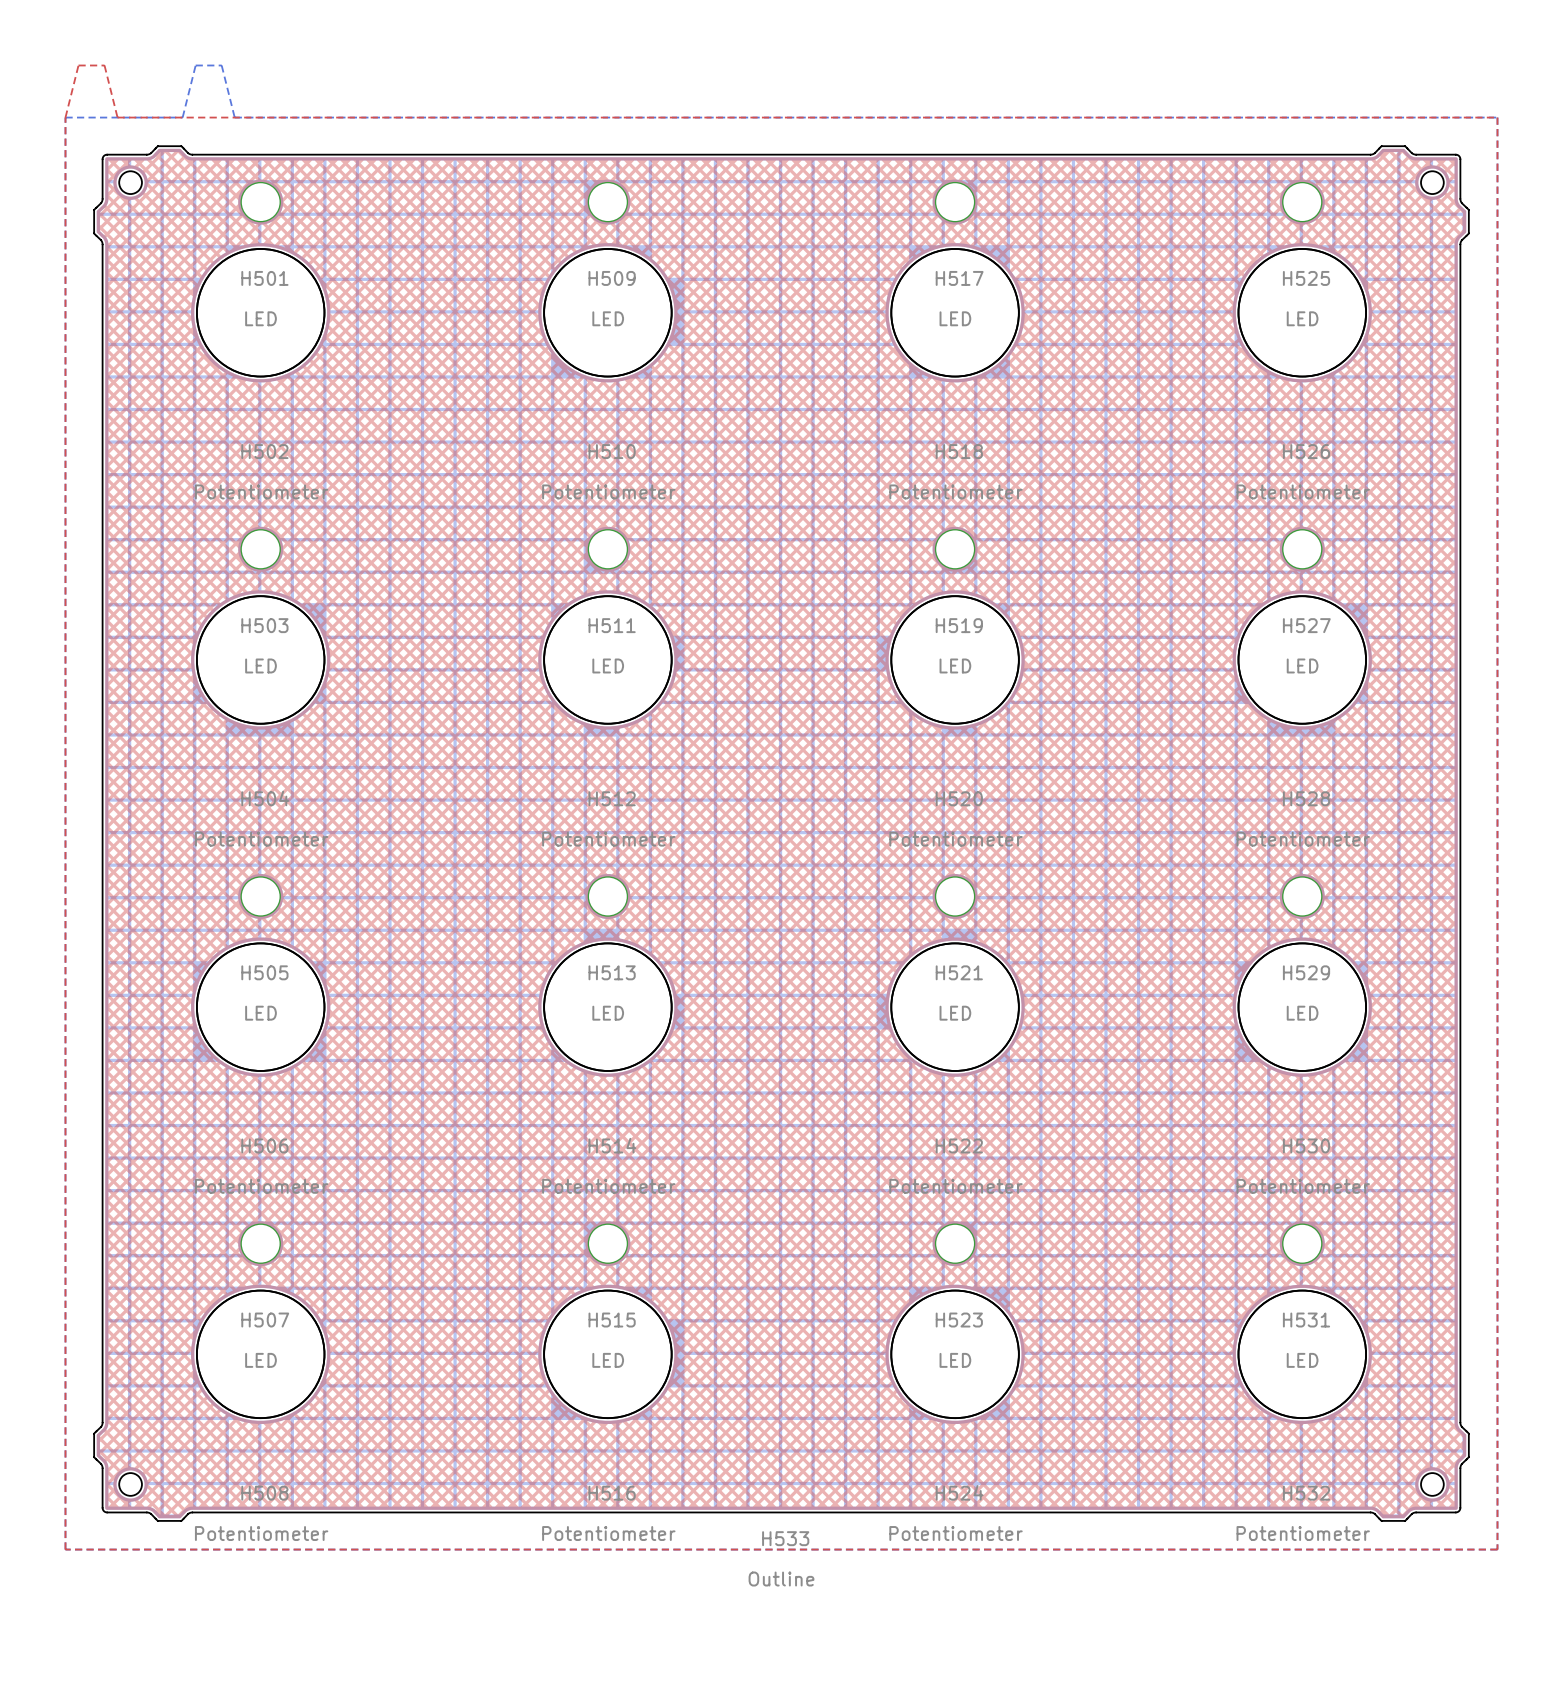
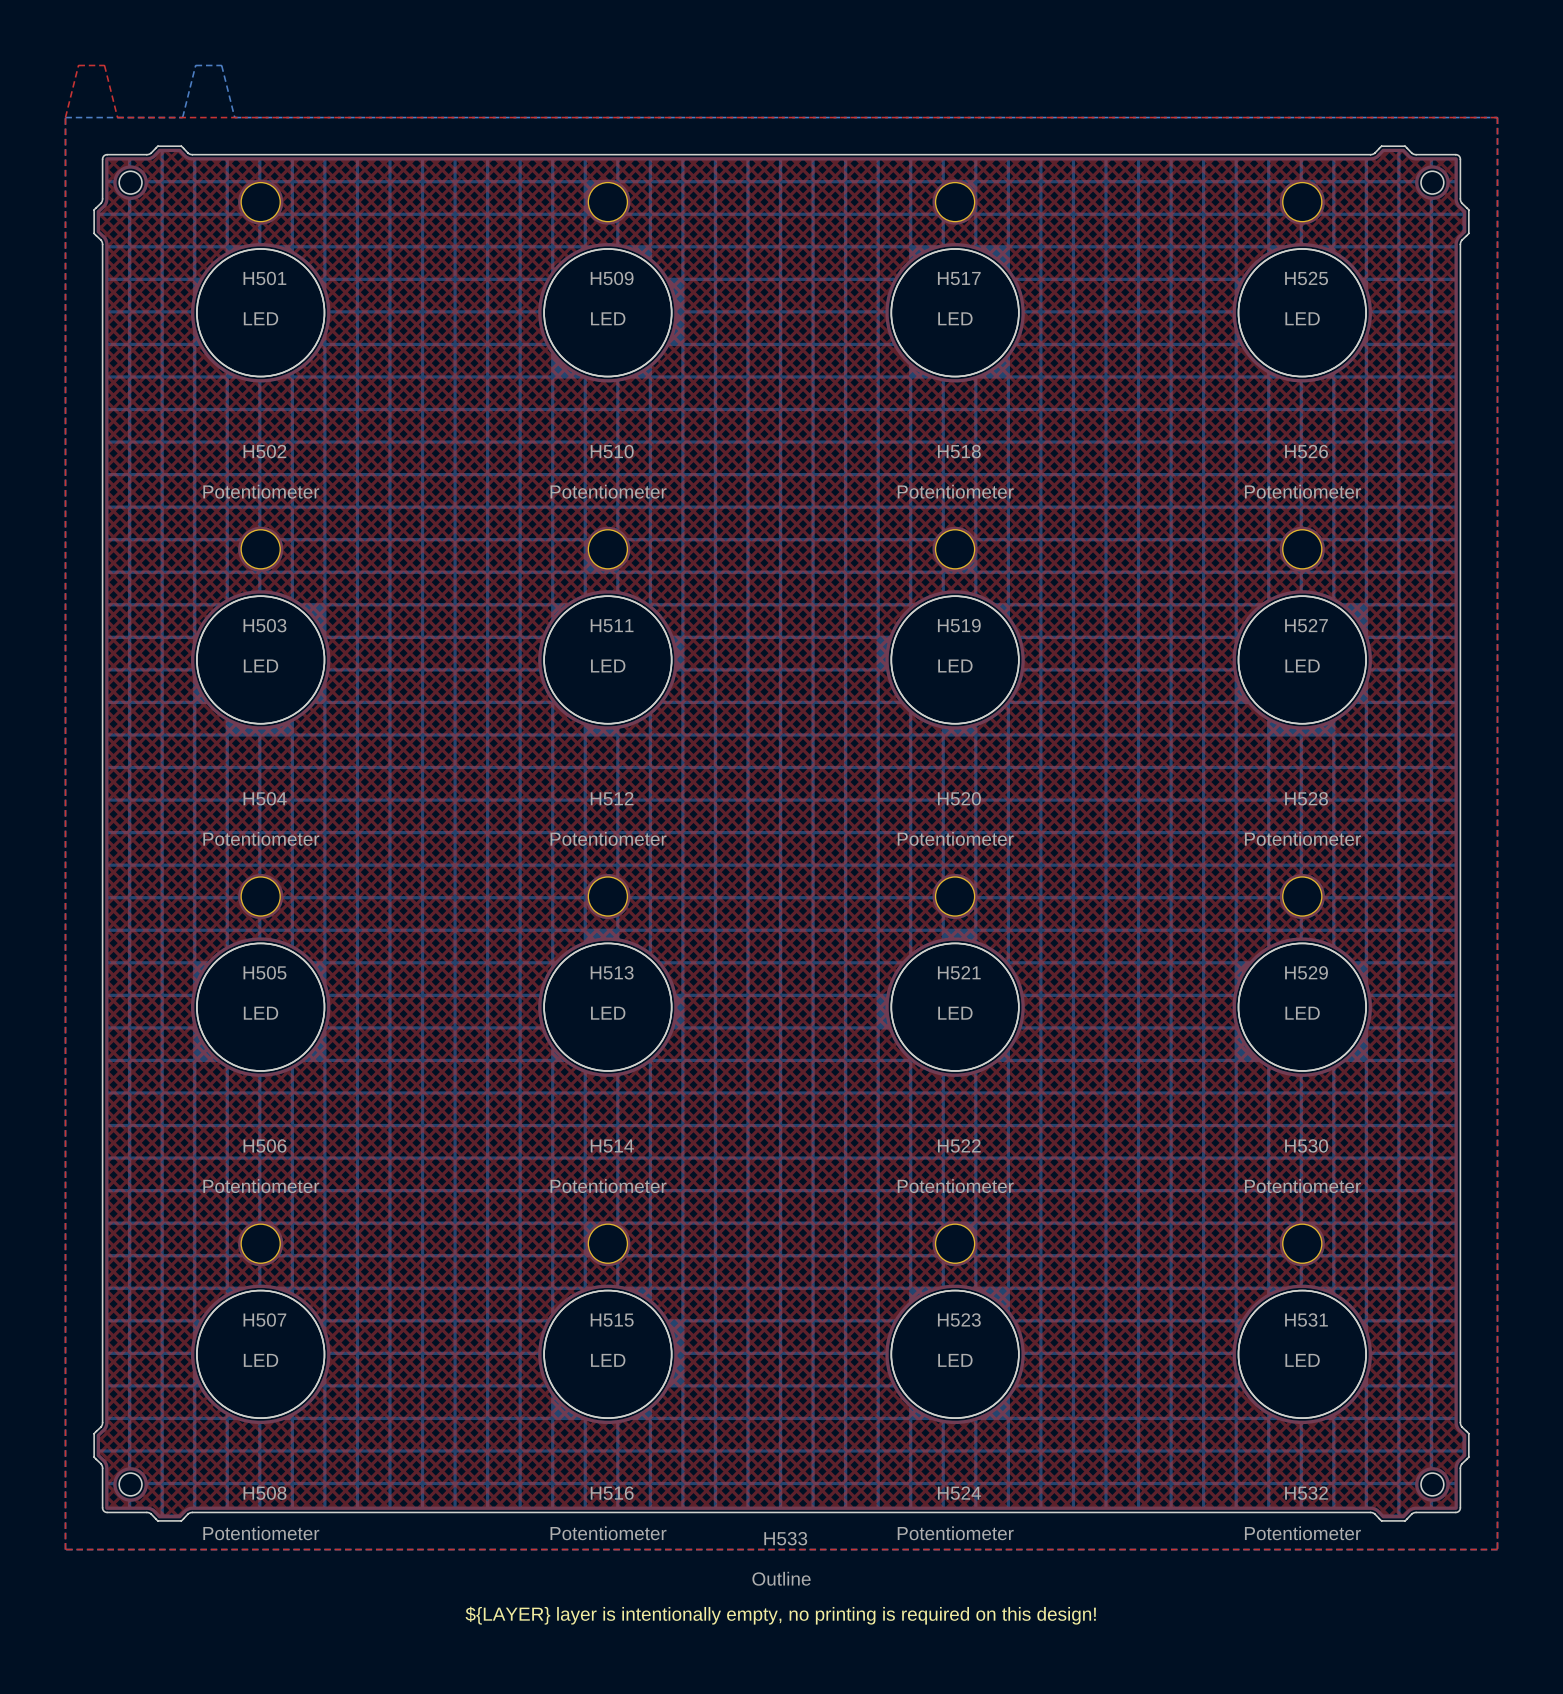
text: none -> ${LAYER} layer is intentionally empty, no printing is required on this design! (780, 1615)

